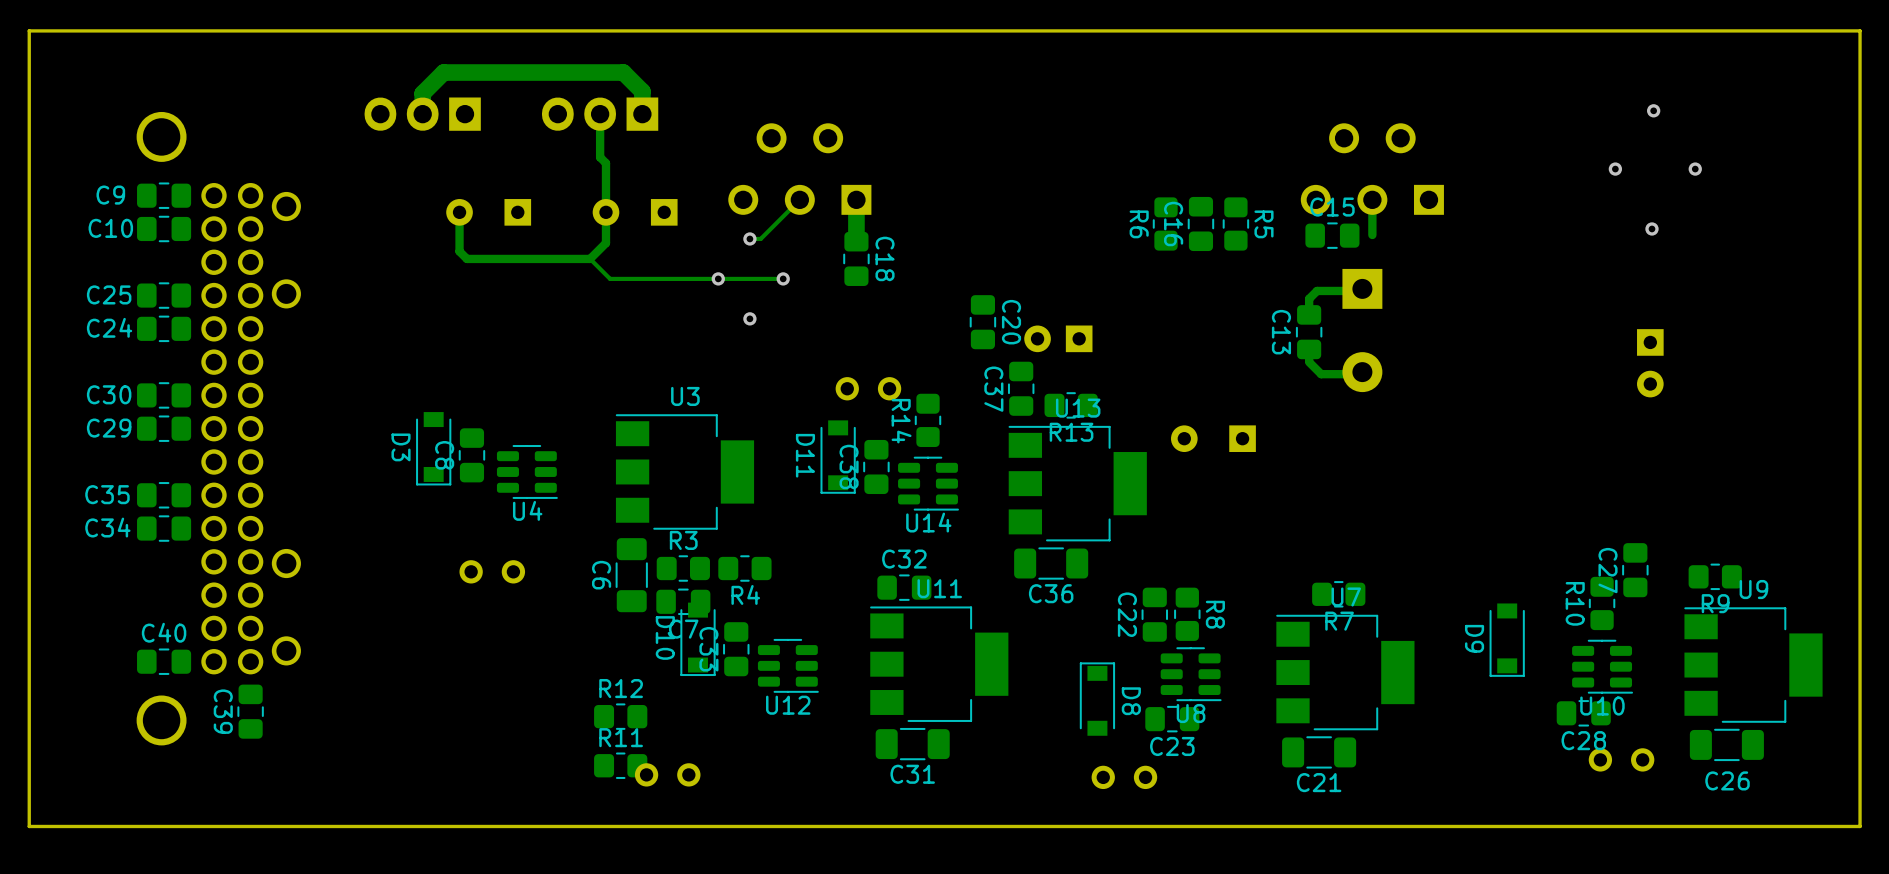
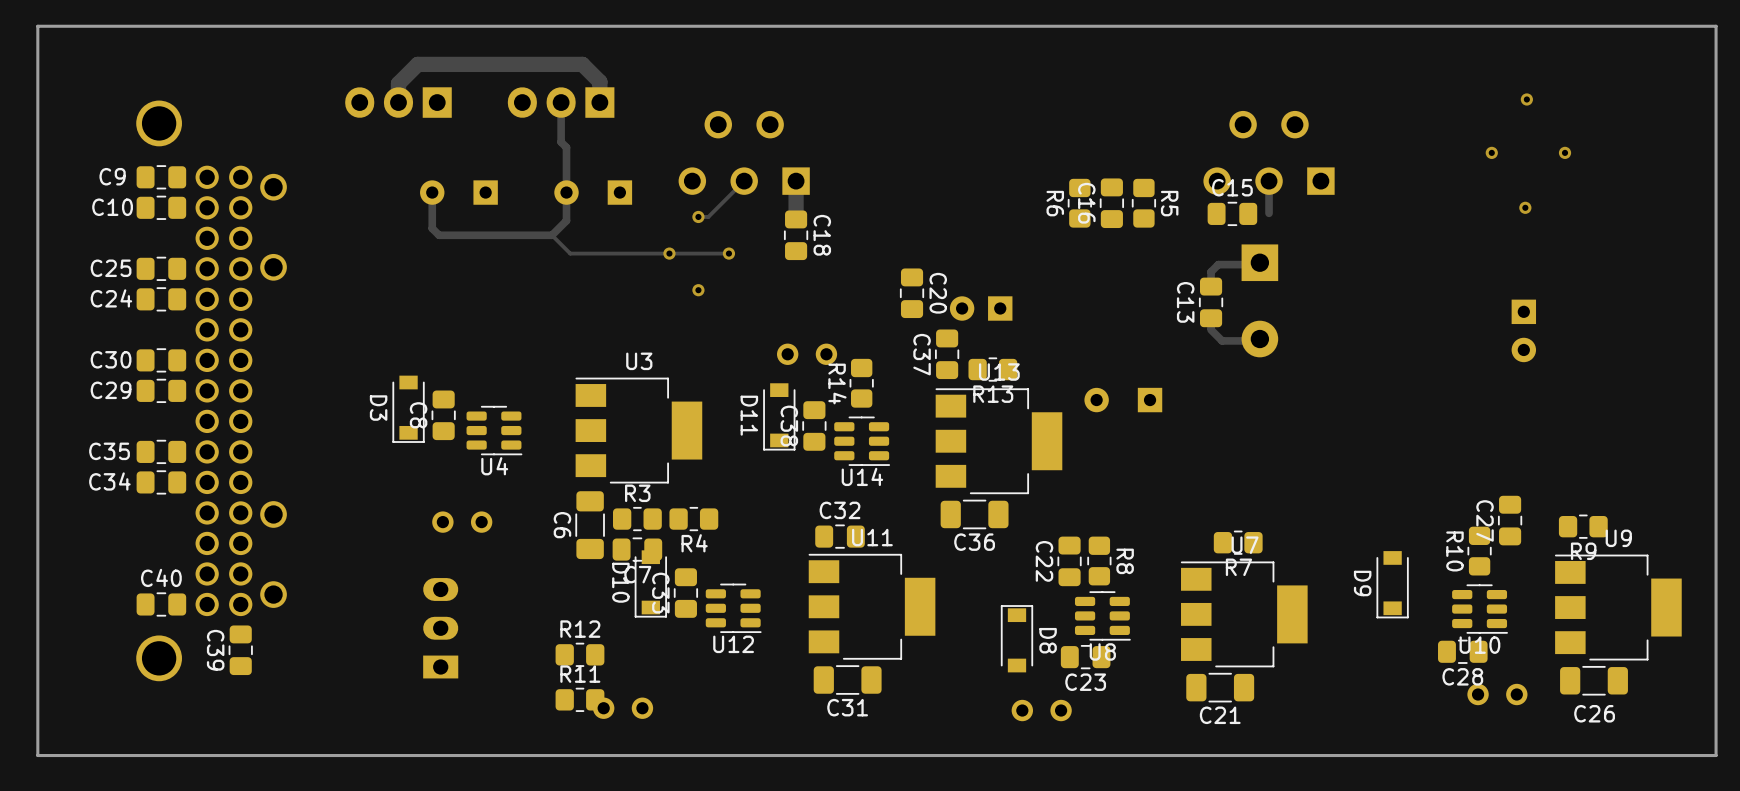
part: none -> (440, 628)

